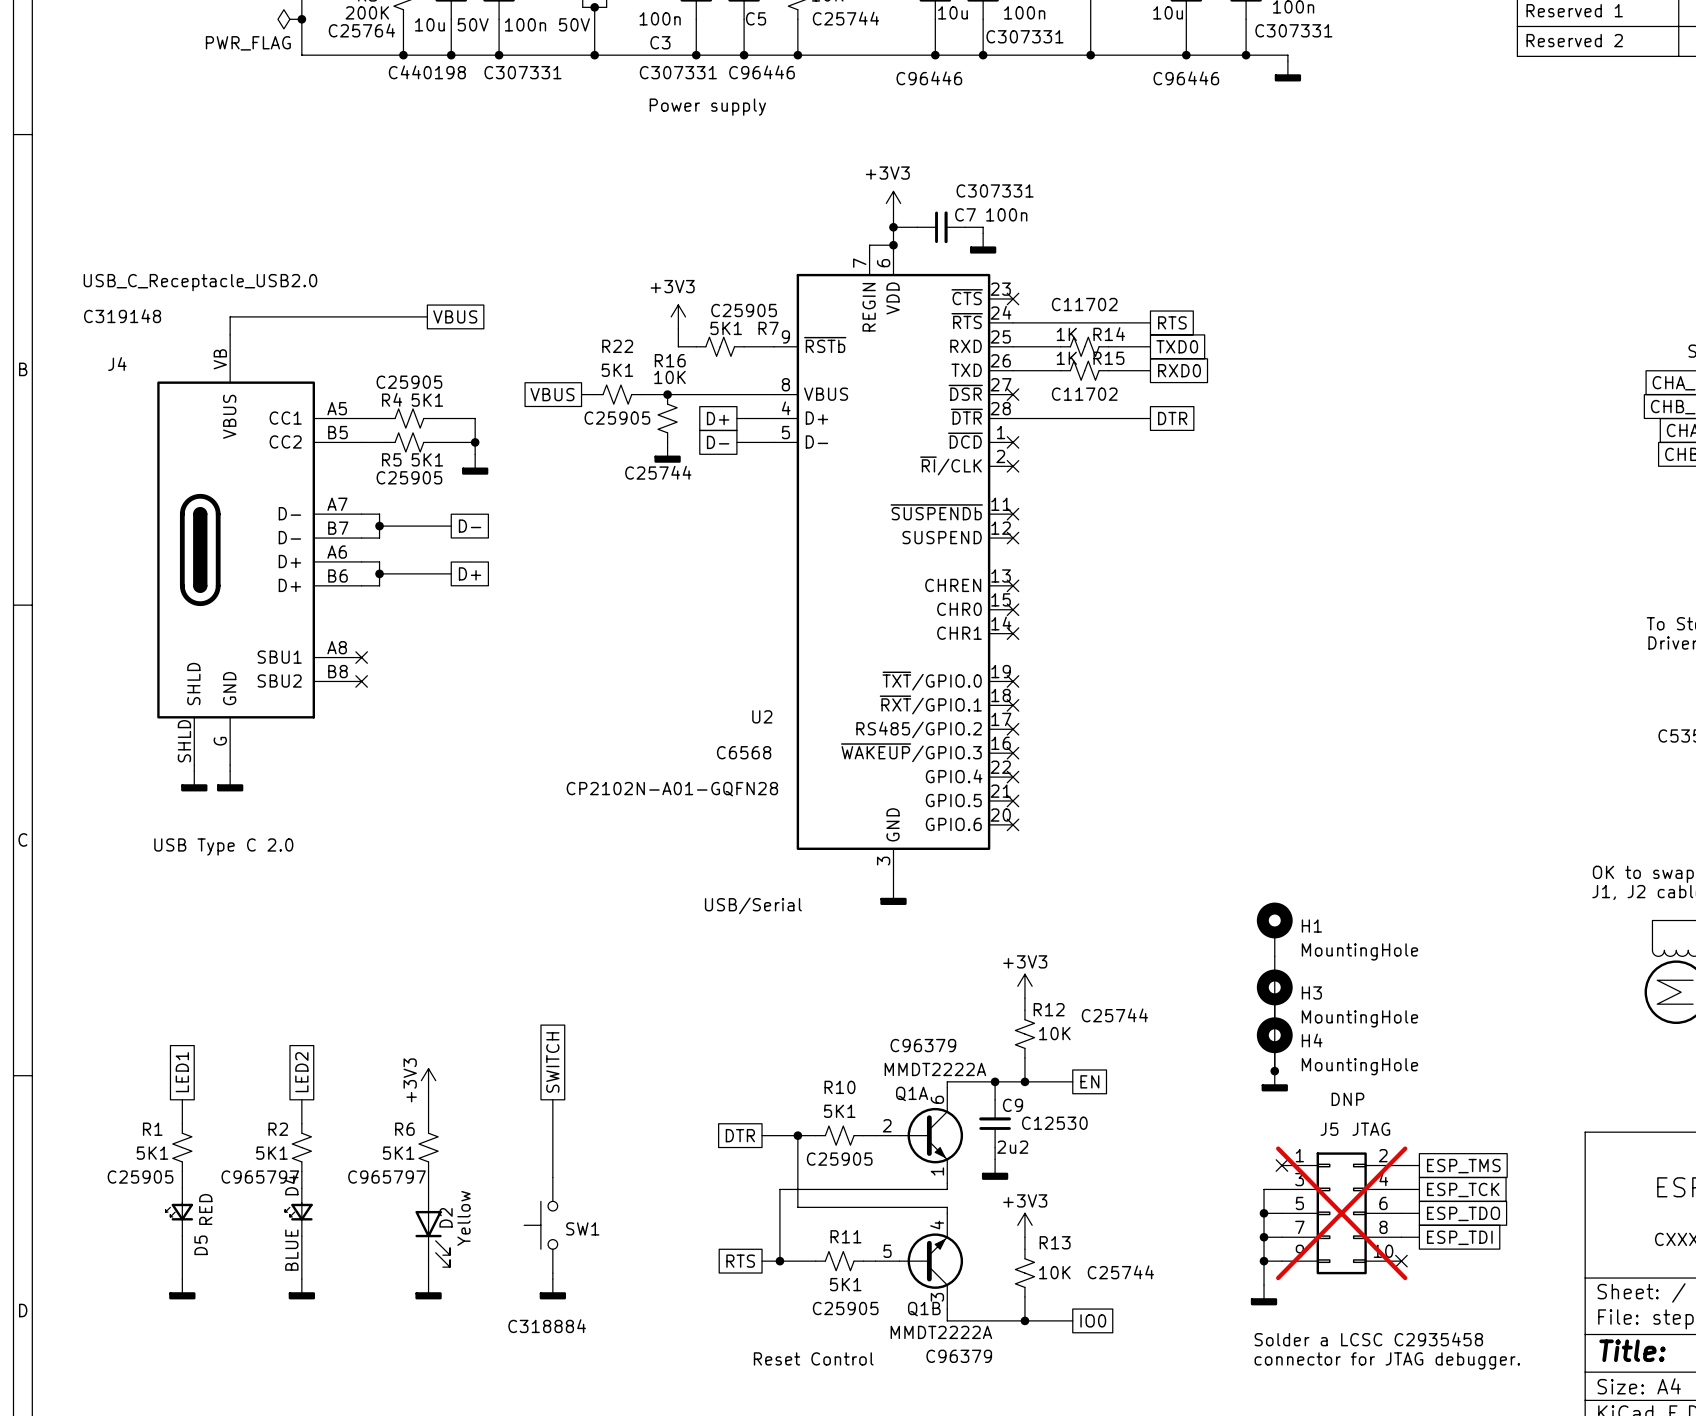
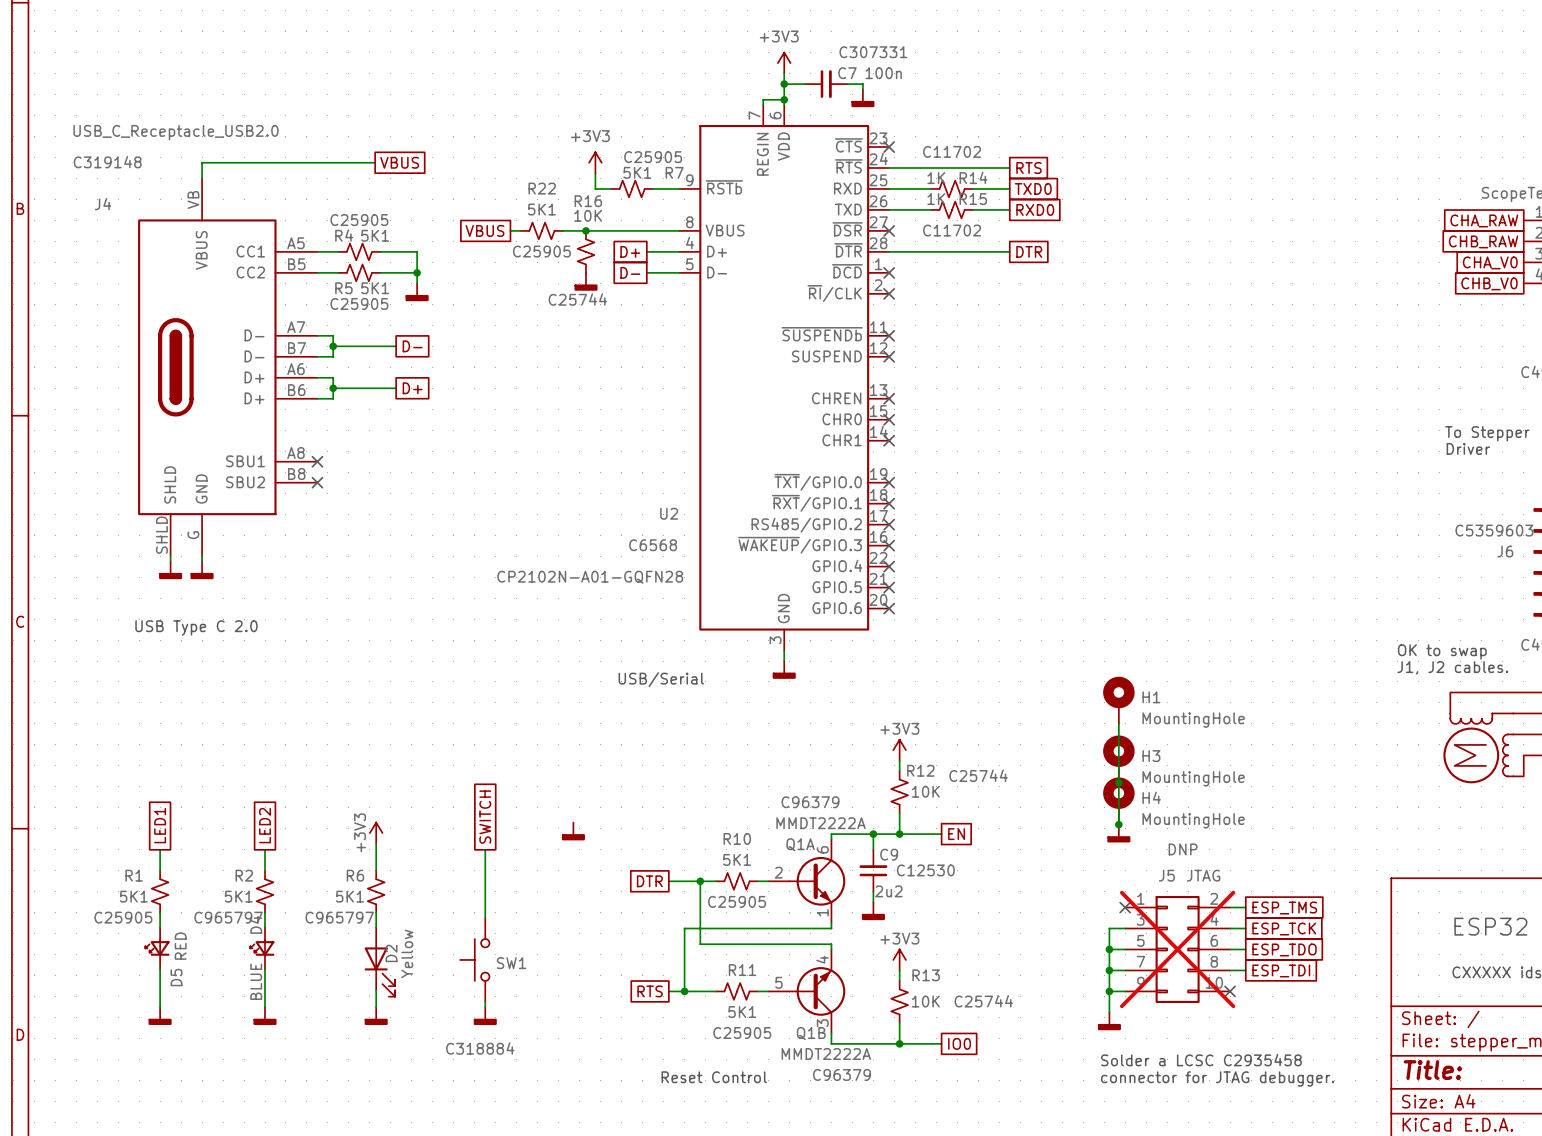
power symbol: none -> (573, 831)

